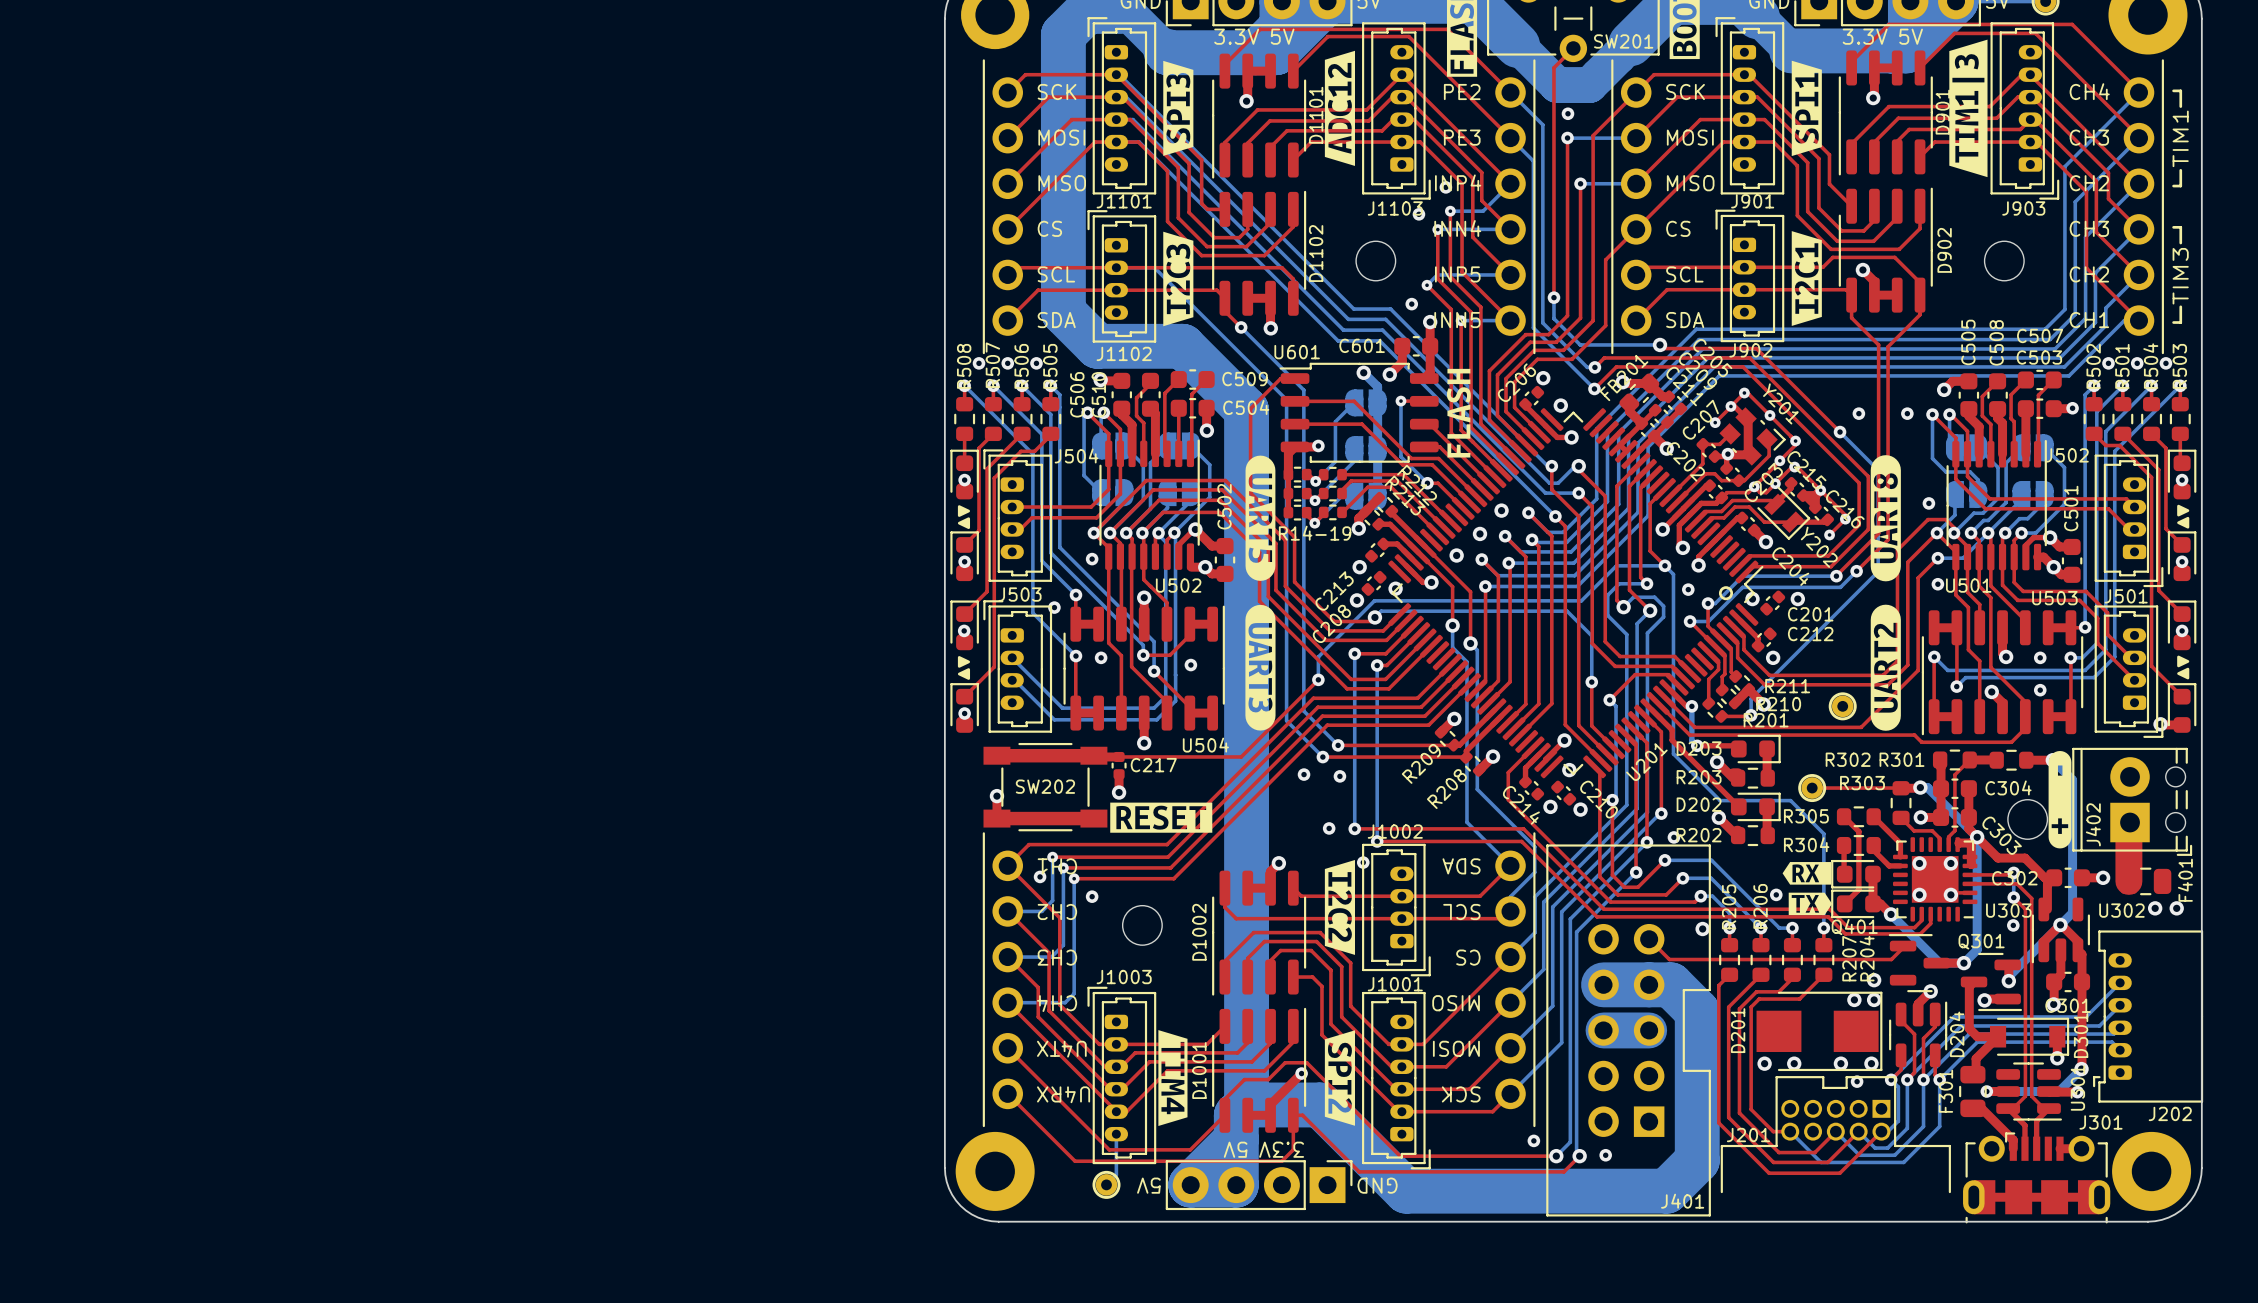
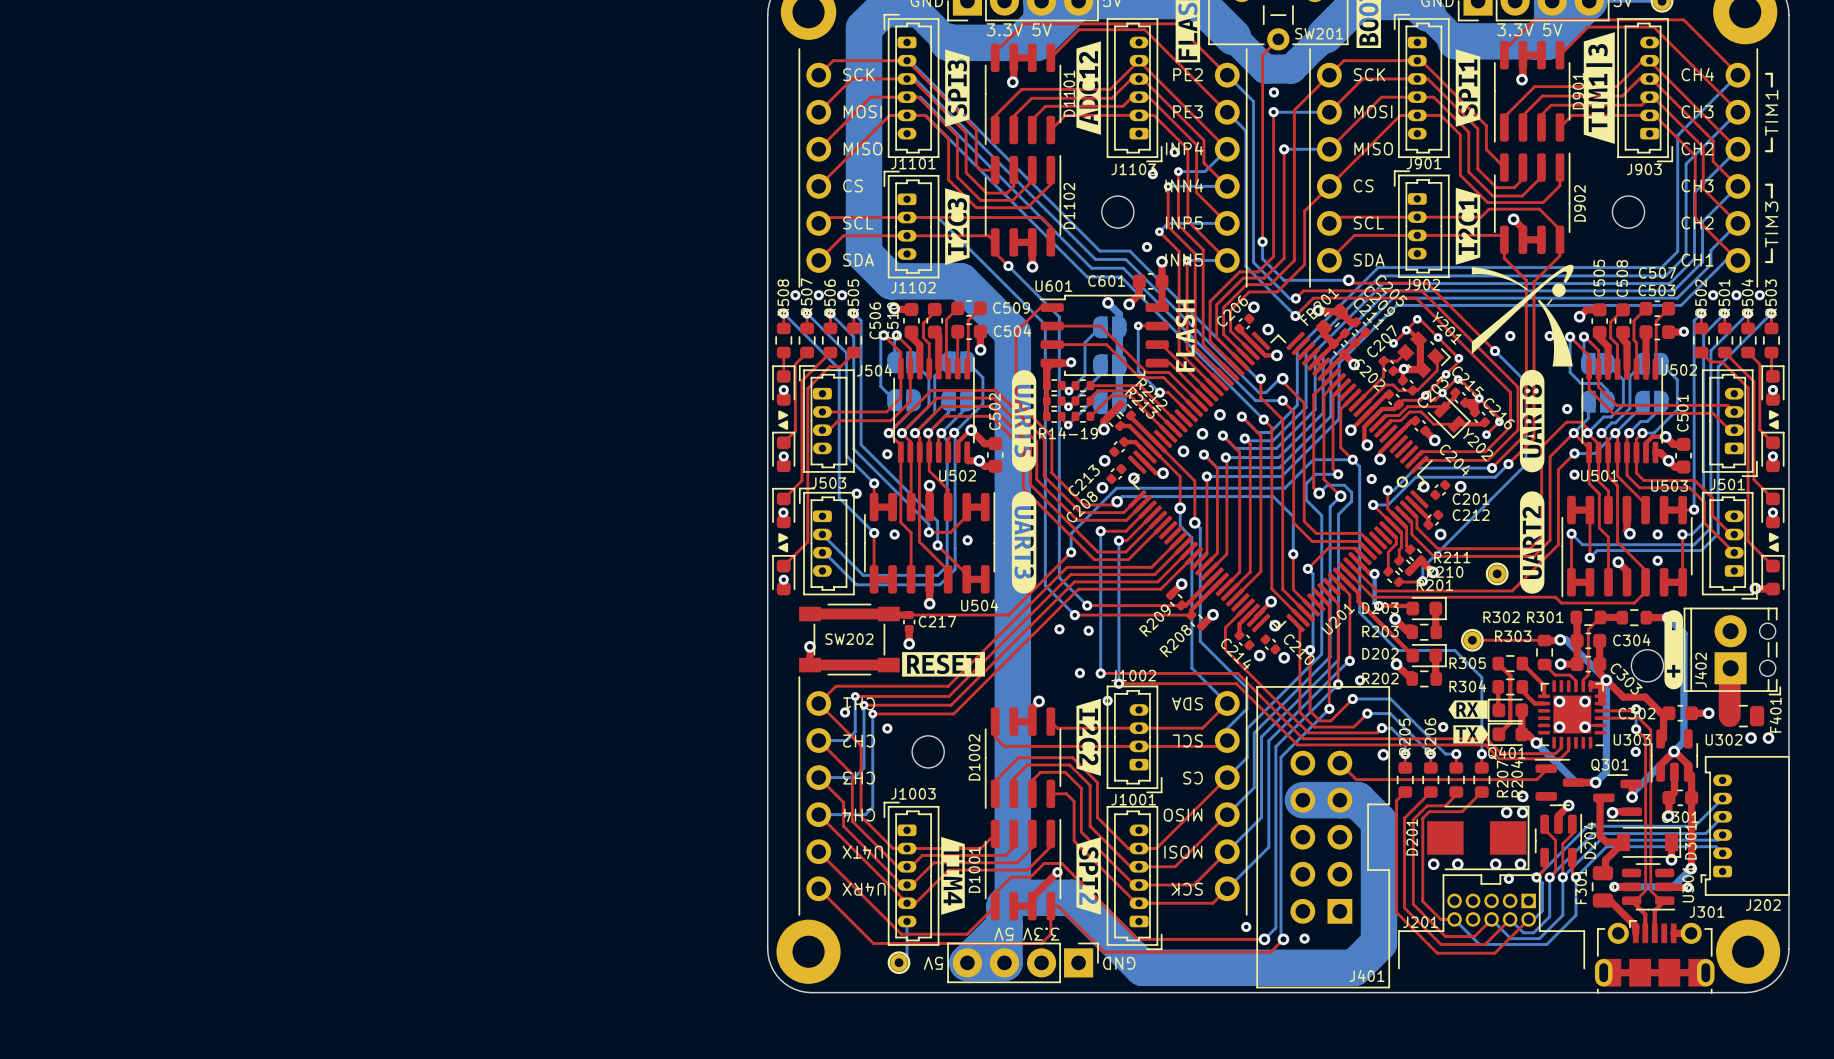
drawing: none -> [1471, 264, 1574, 367]
bottom track: (1603, 1030) (1649, 1030) -> none

